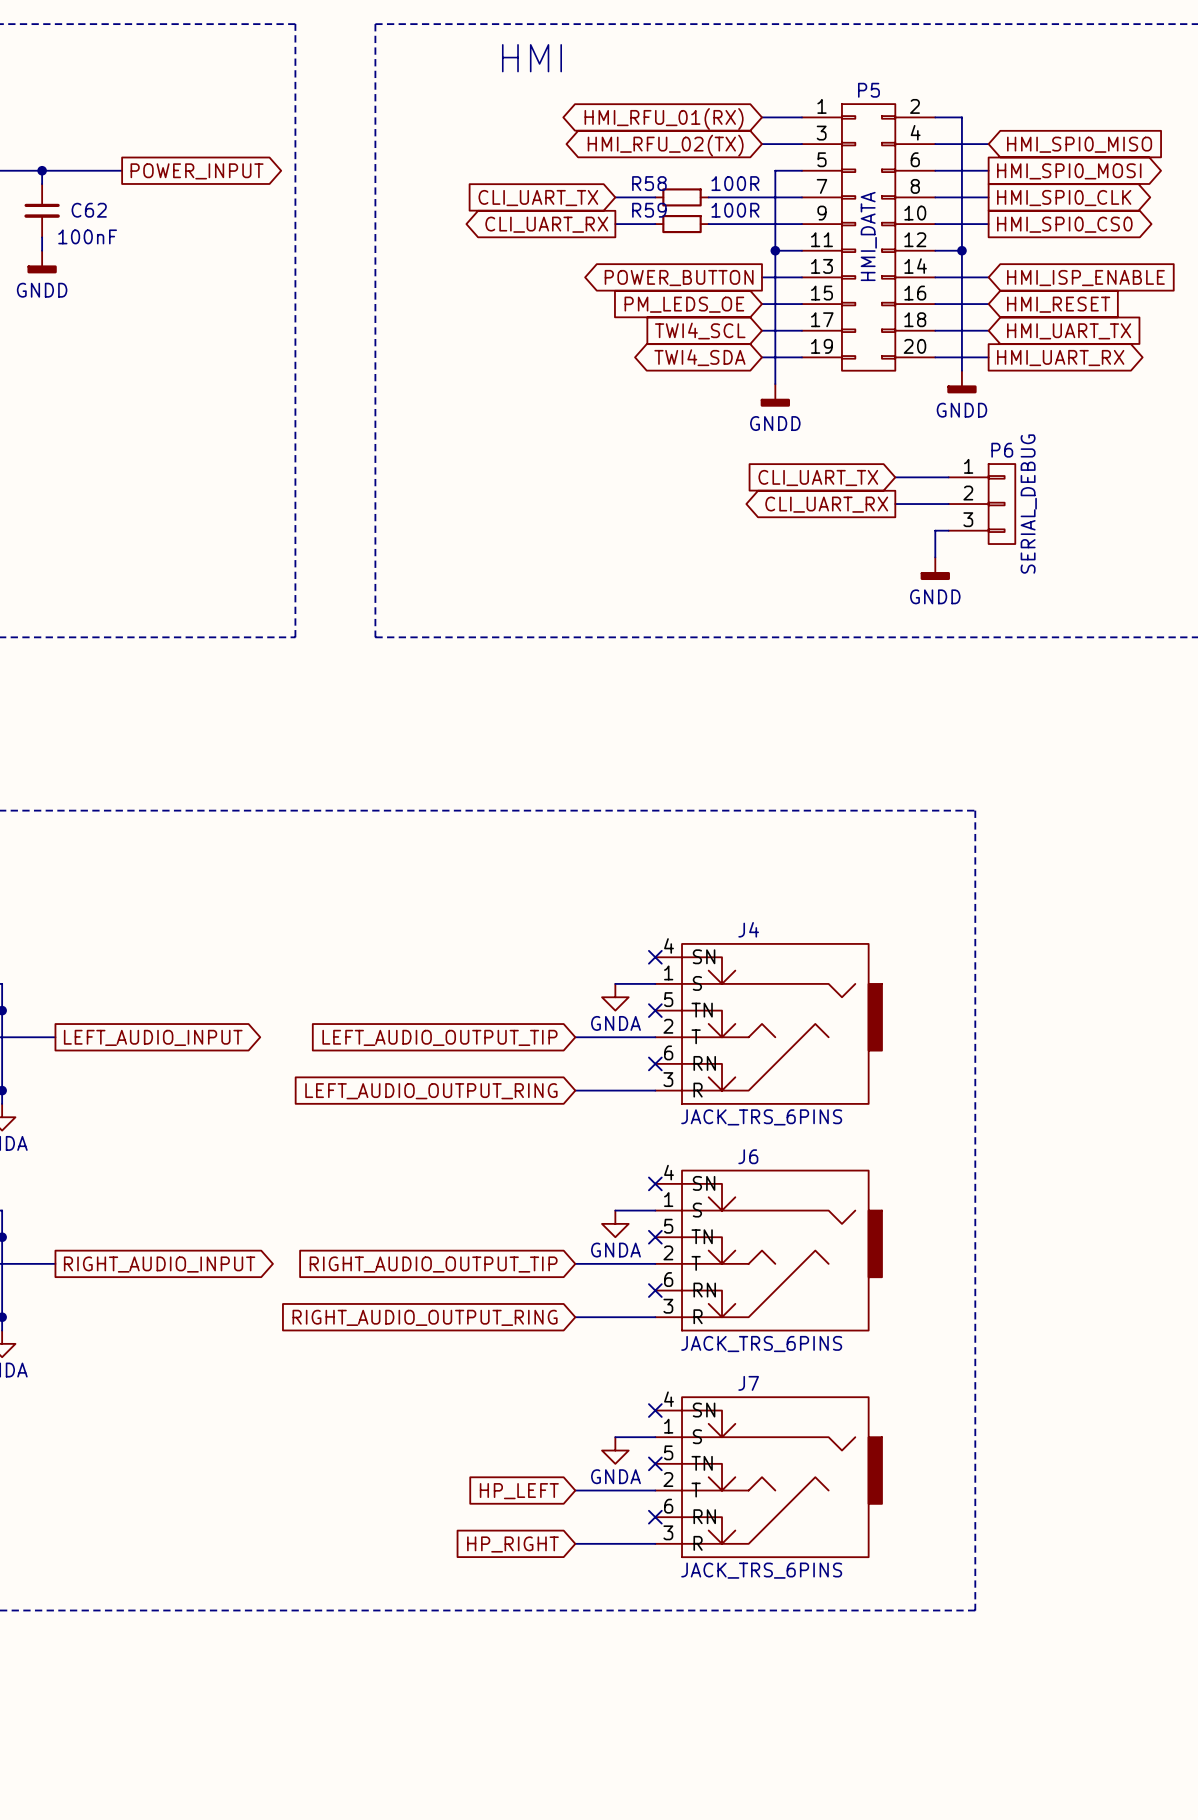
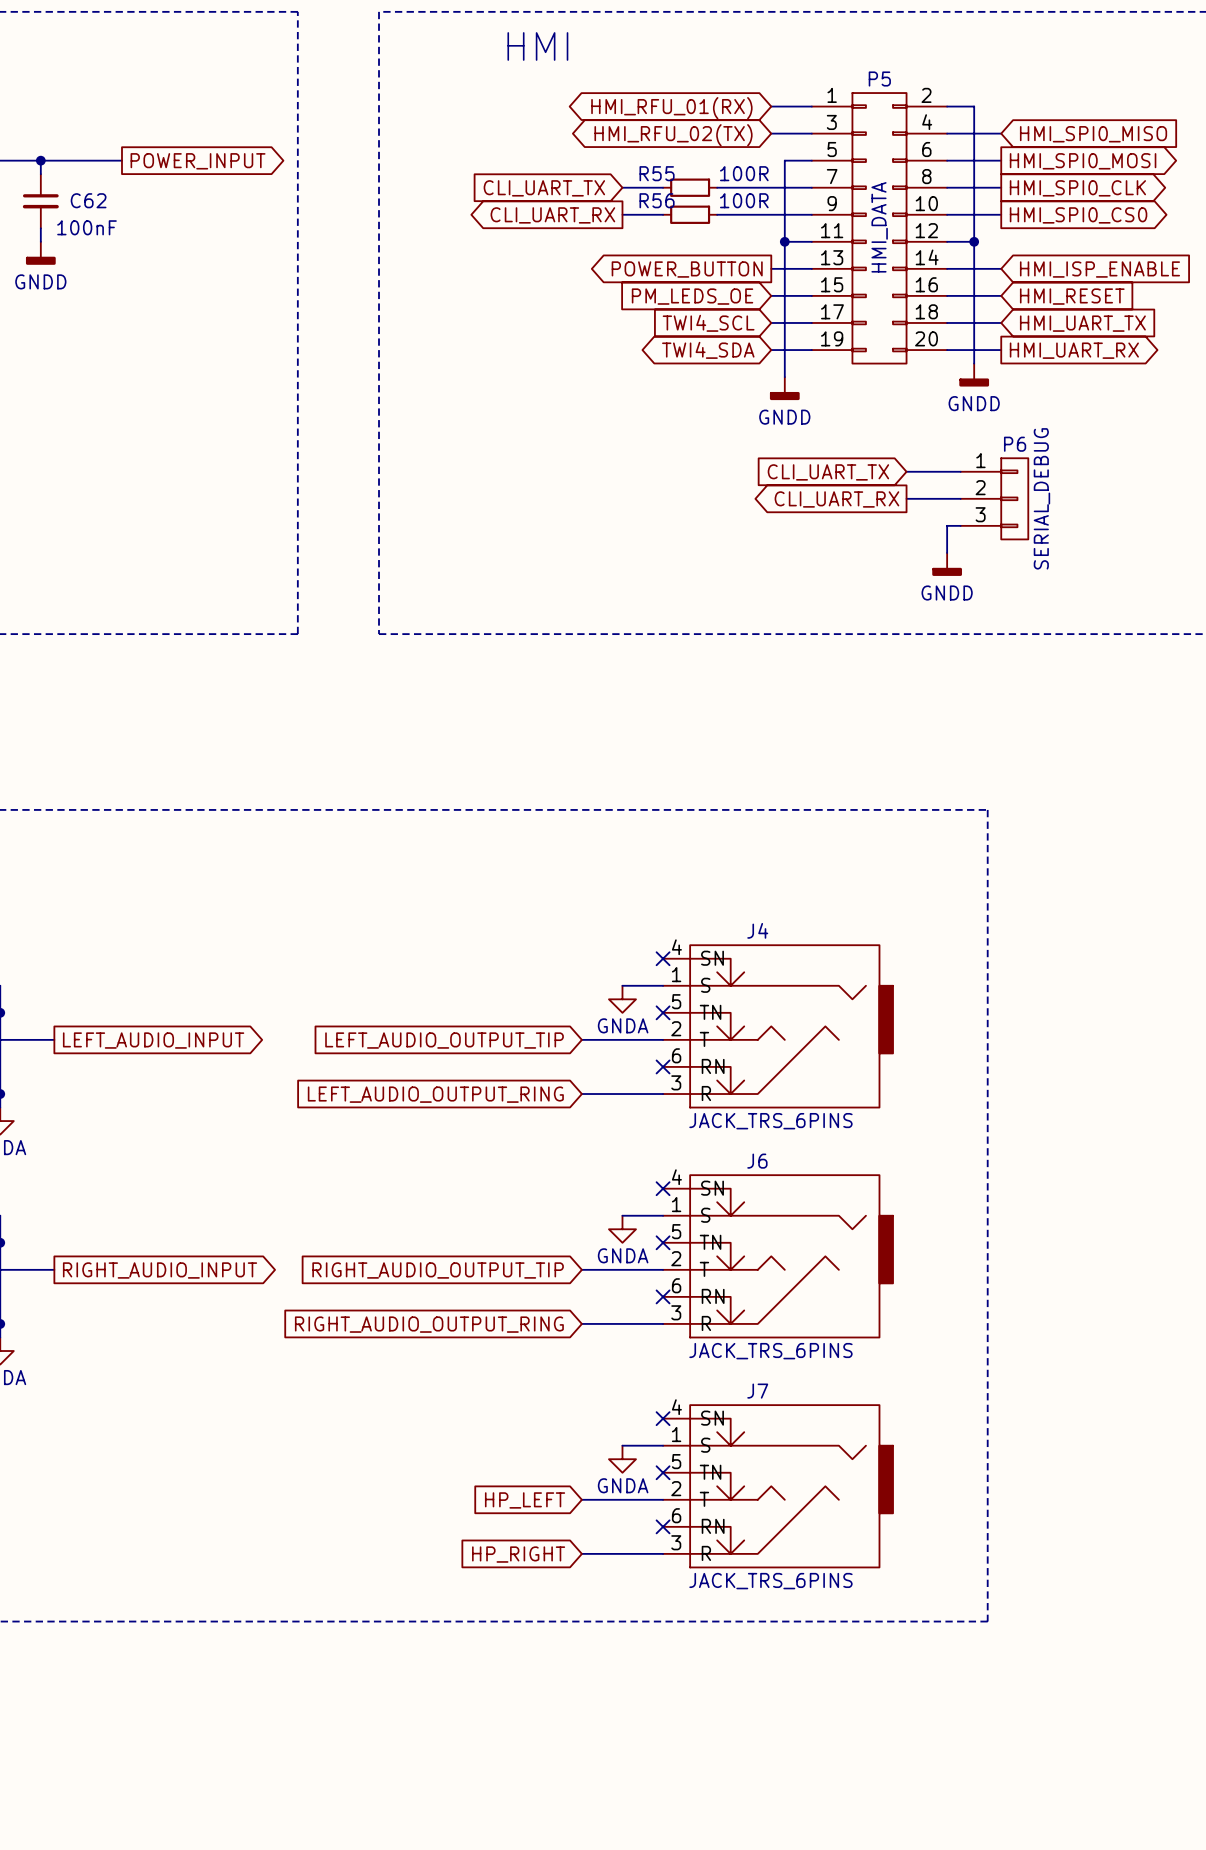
R58 name: R58 (649, 183) -> R55 (657, 173)
R59 name: R59 (649, 210) -> R56 (657, 200)

